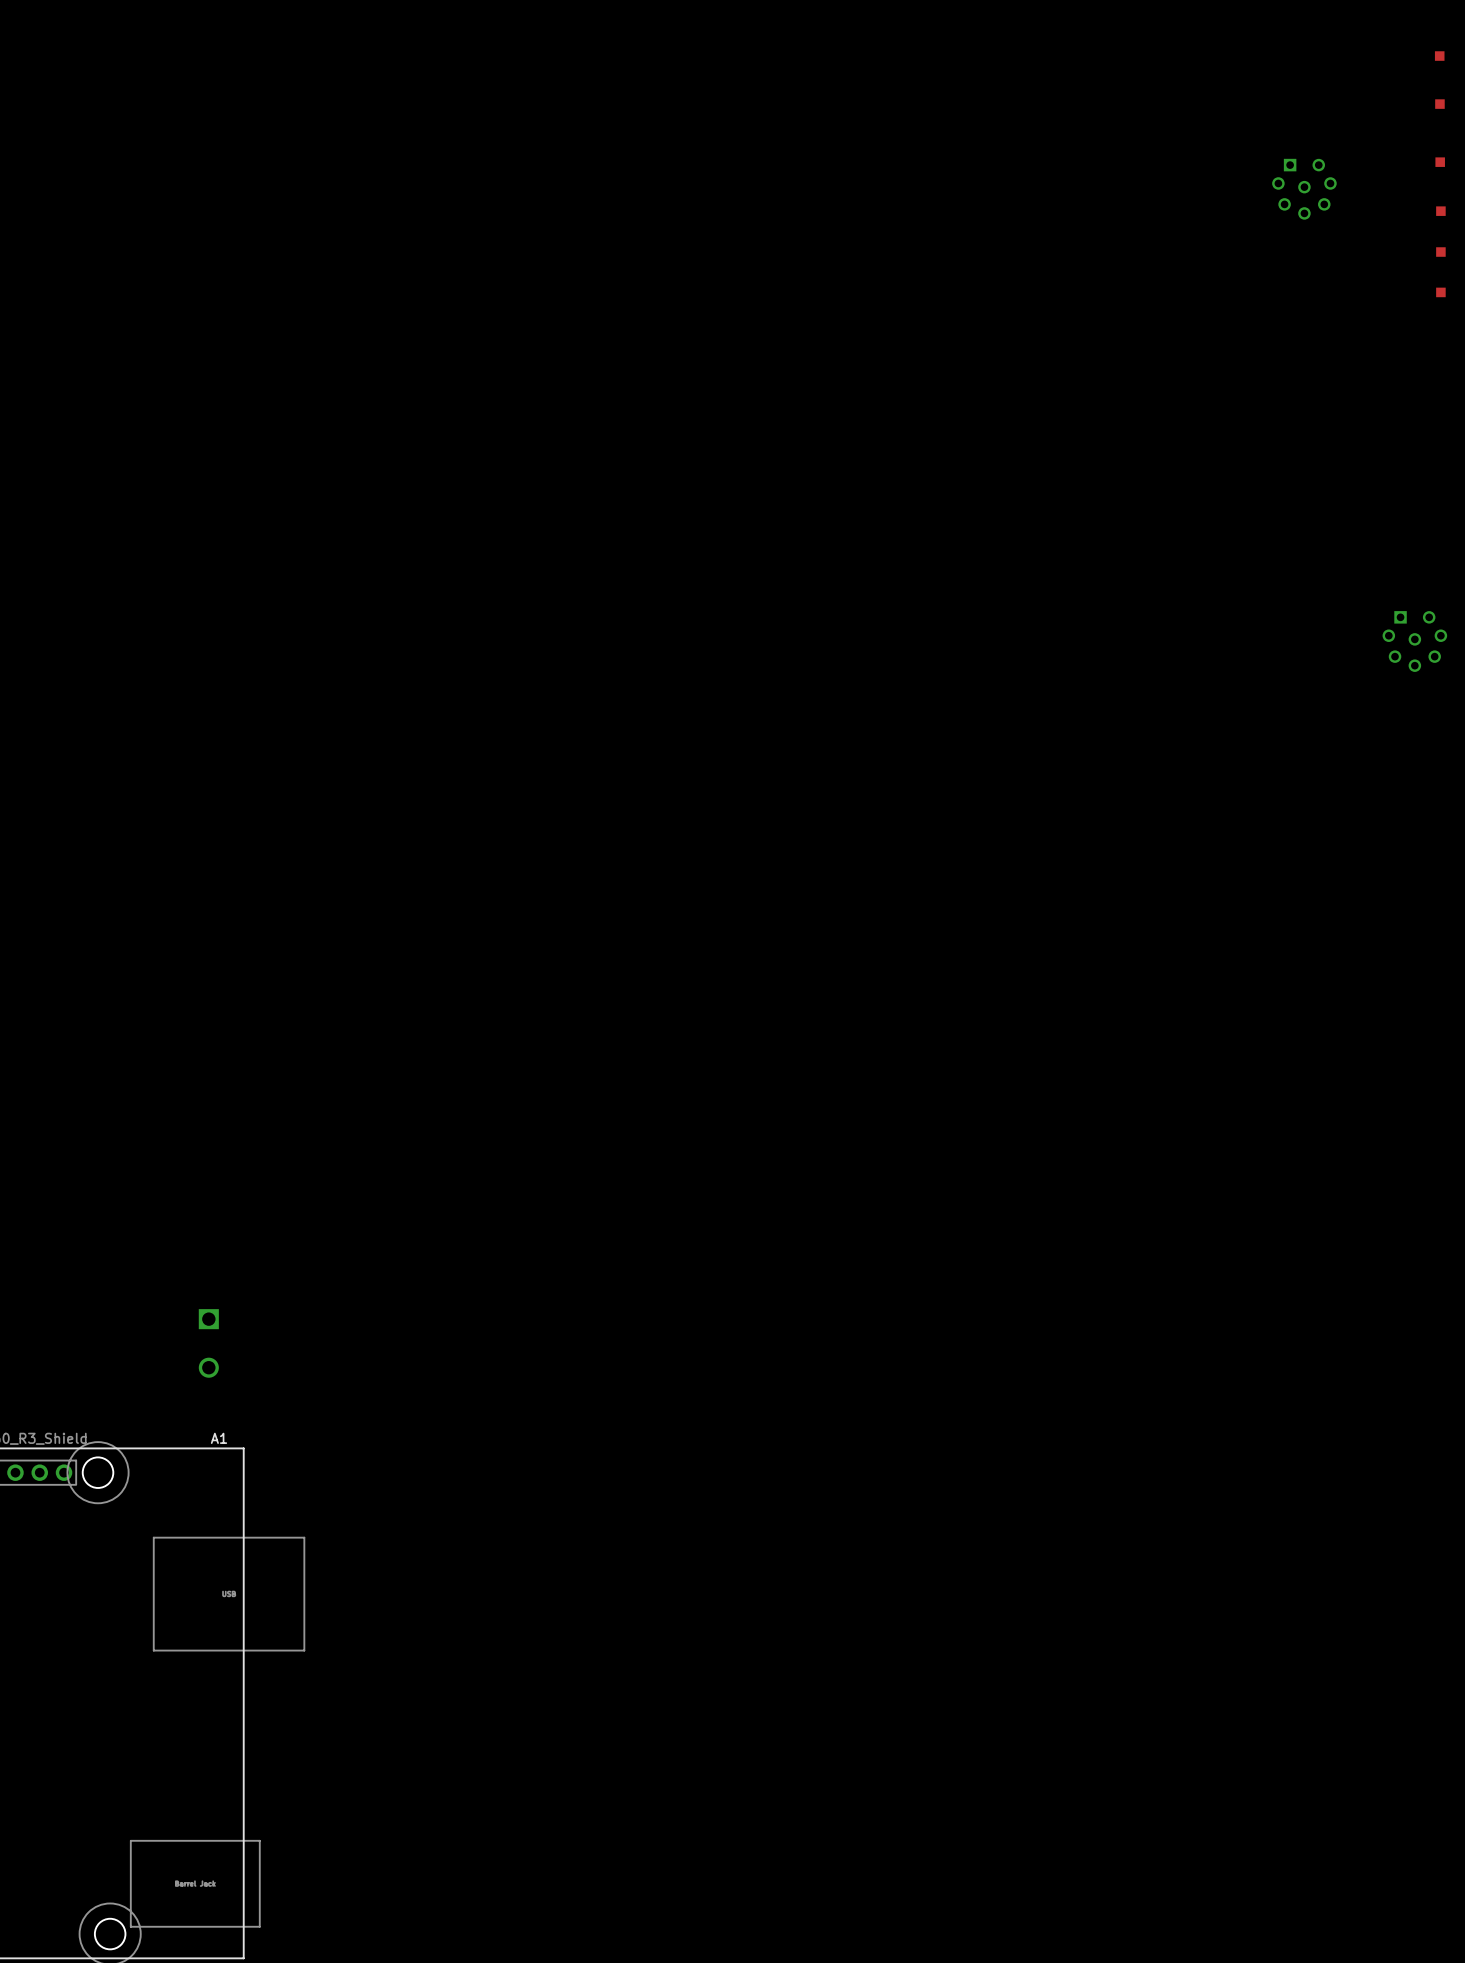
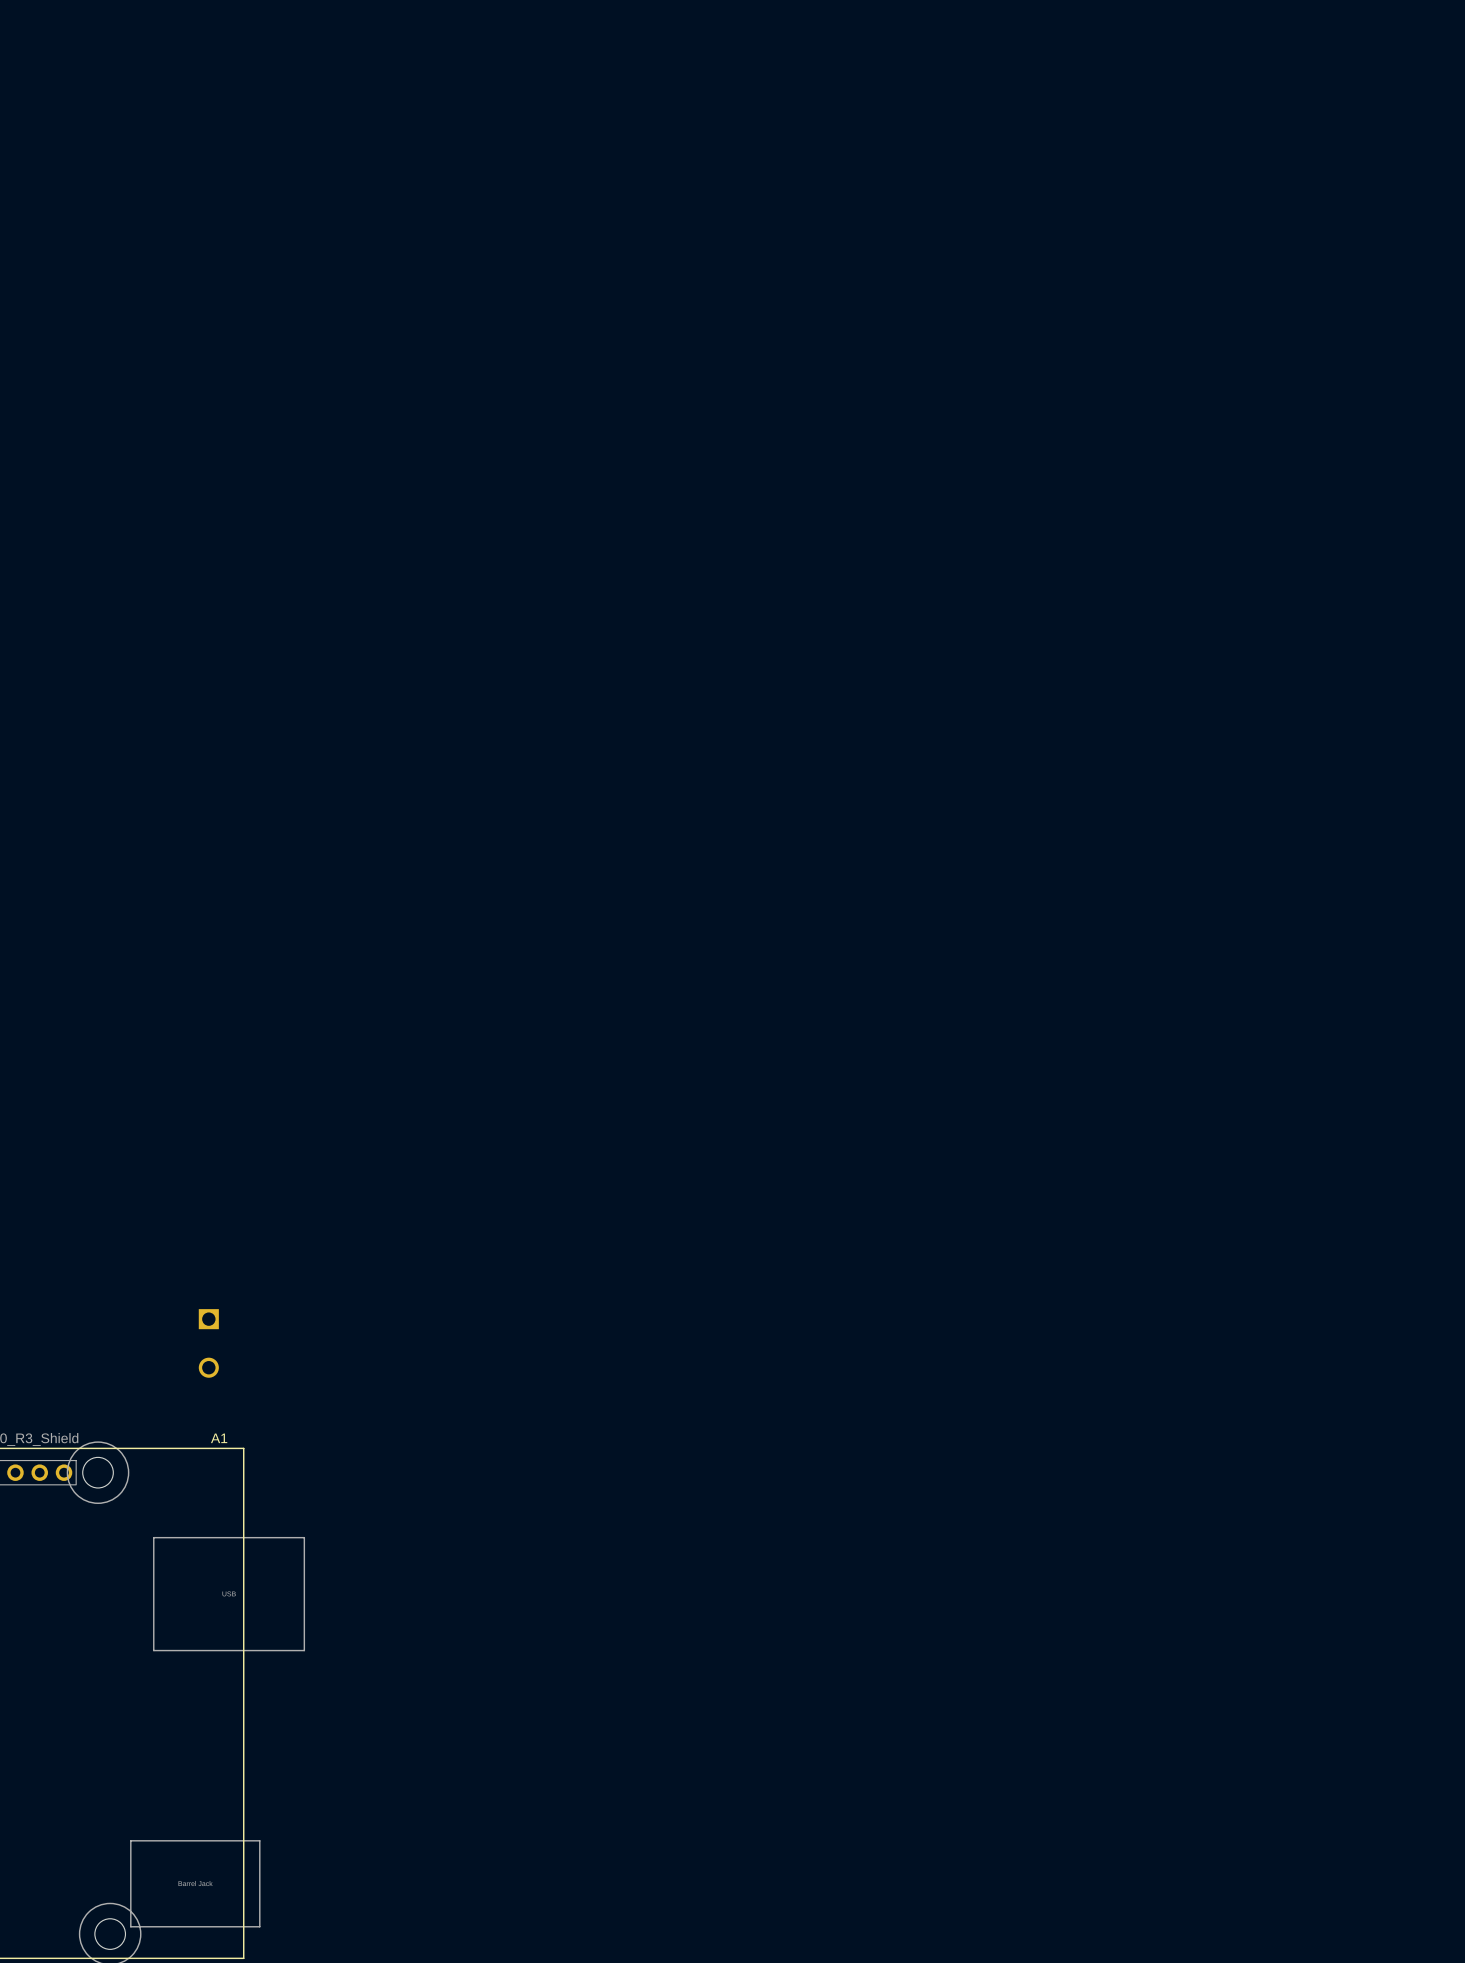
part: (1439, 56) -> none
part: (1439, 104) -> none
part: (1440, 162) -> none
part: (1304, 189) -> none
part: (1440, 211) -> none
part: (1440, 252) -> none
part: (1440, 292) -> none
part: (1414, 641) -> none

